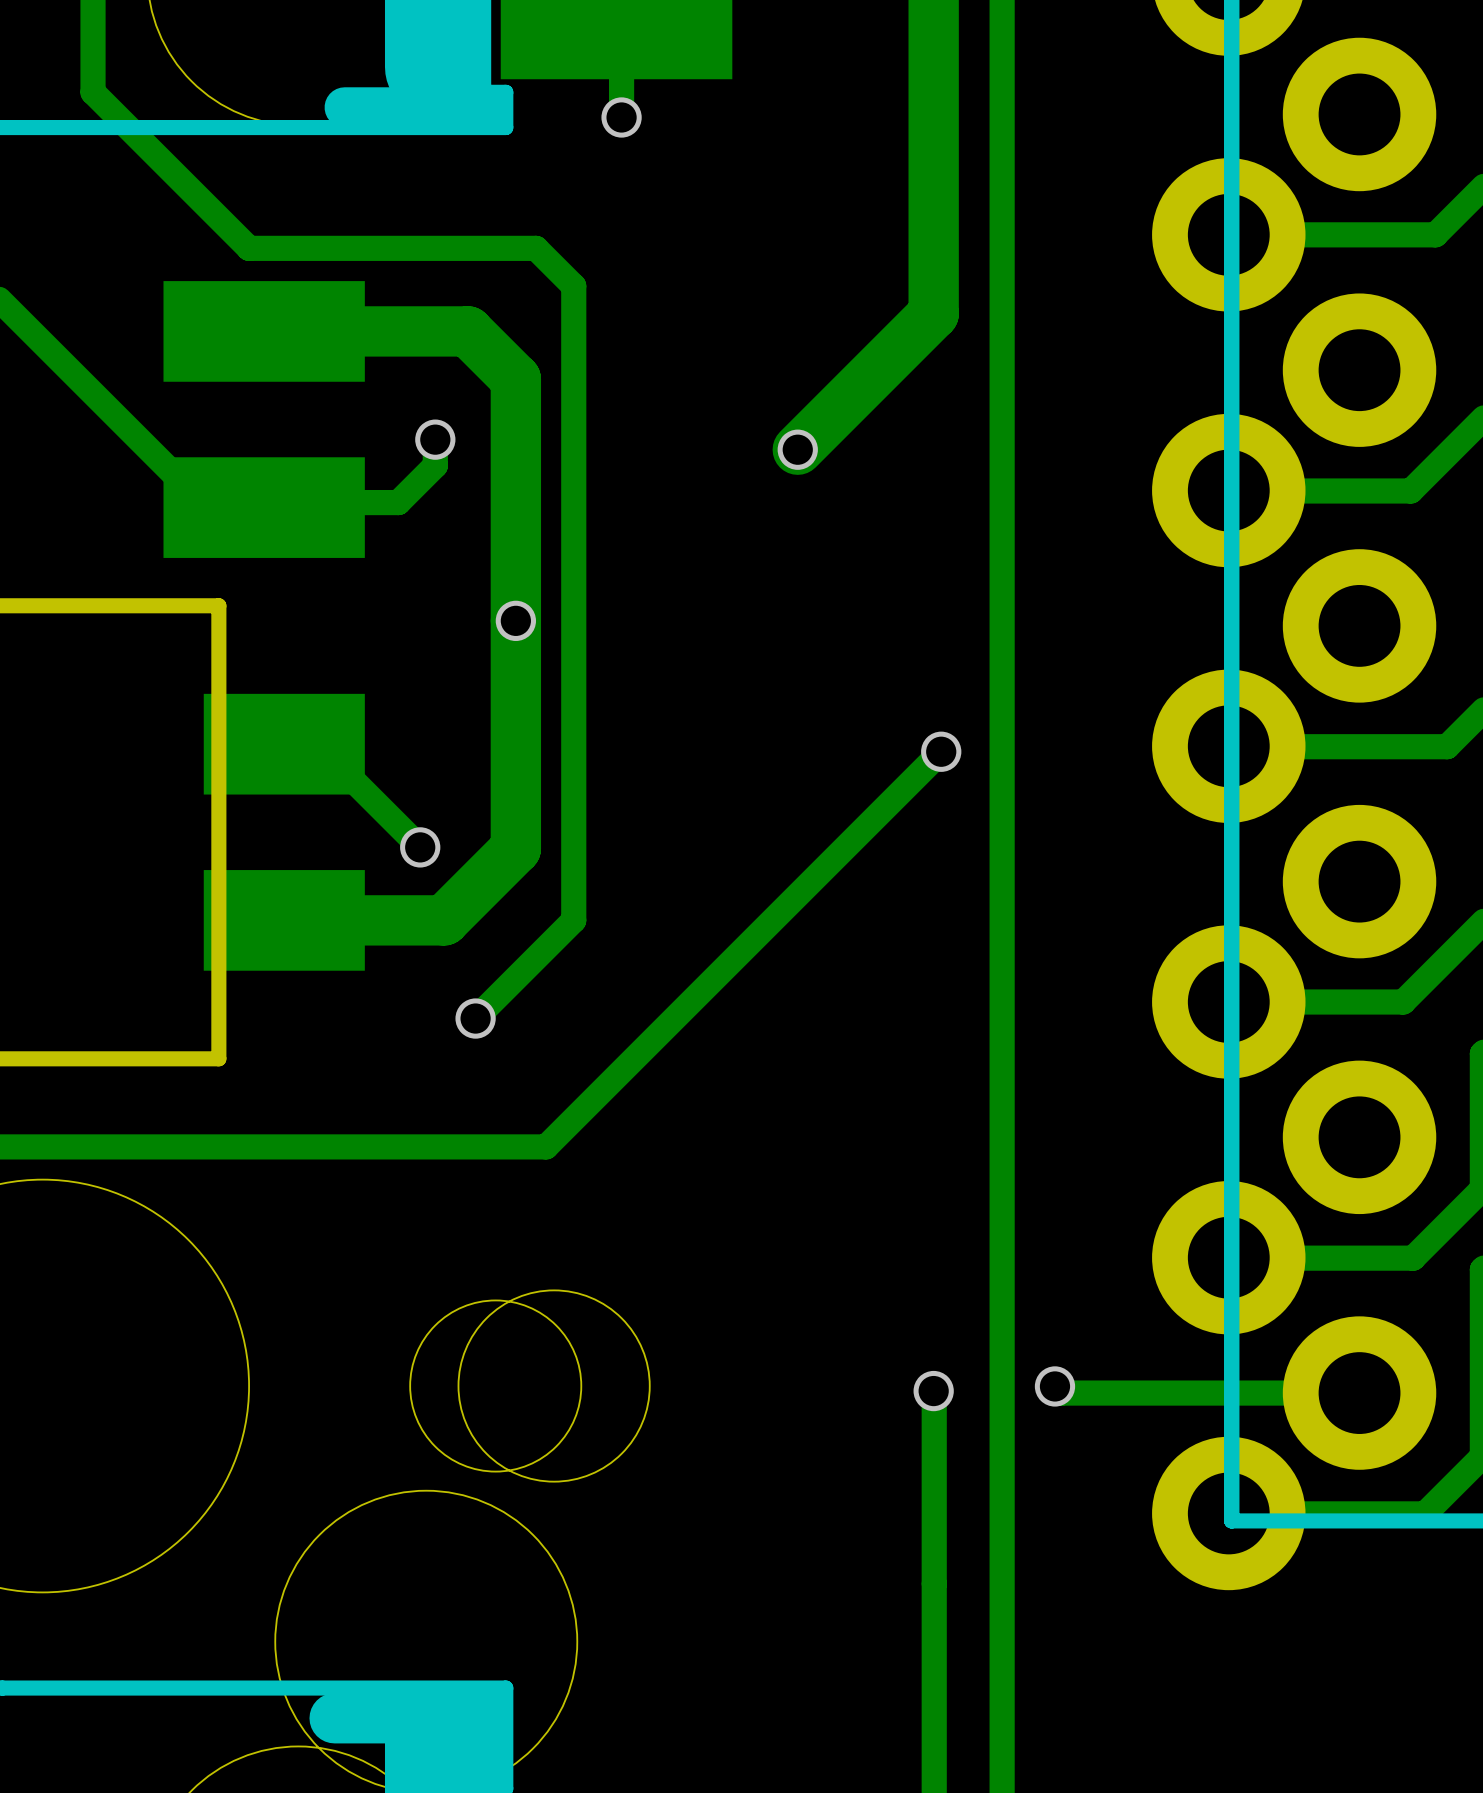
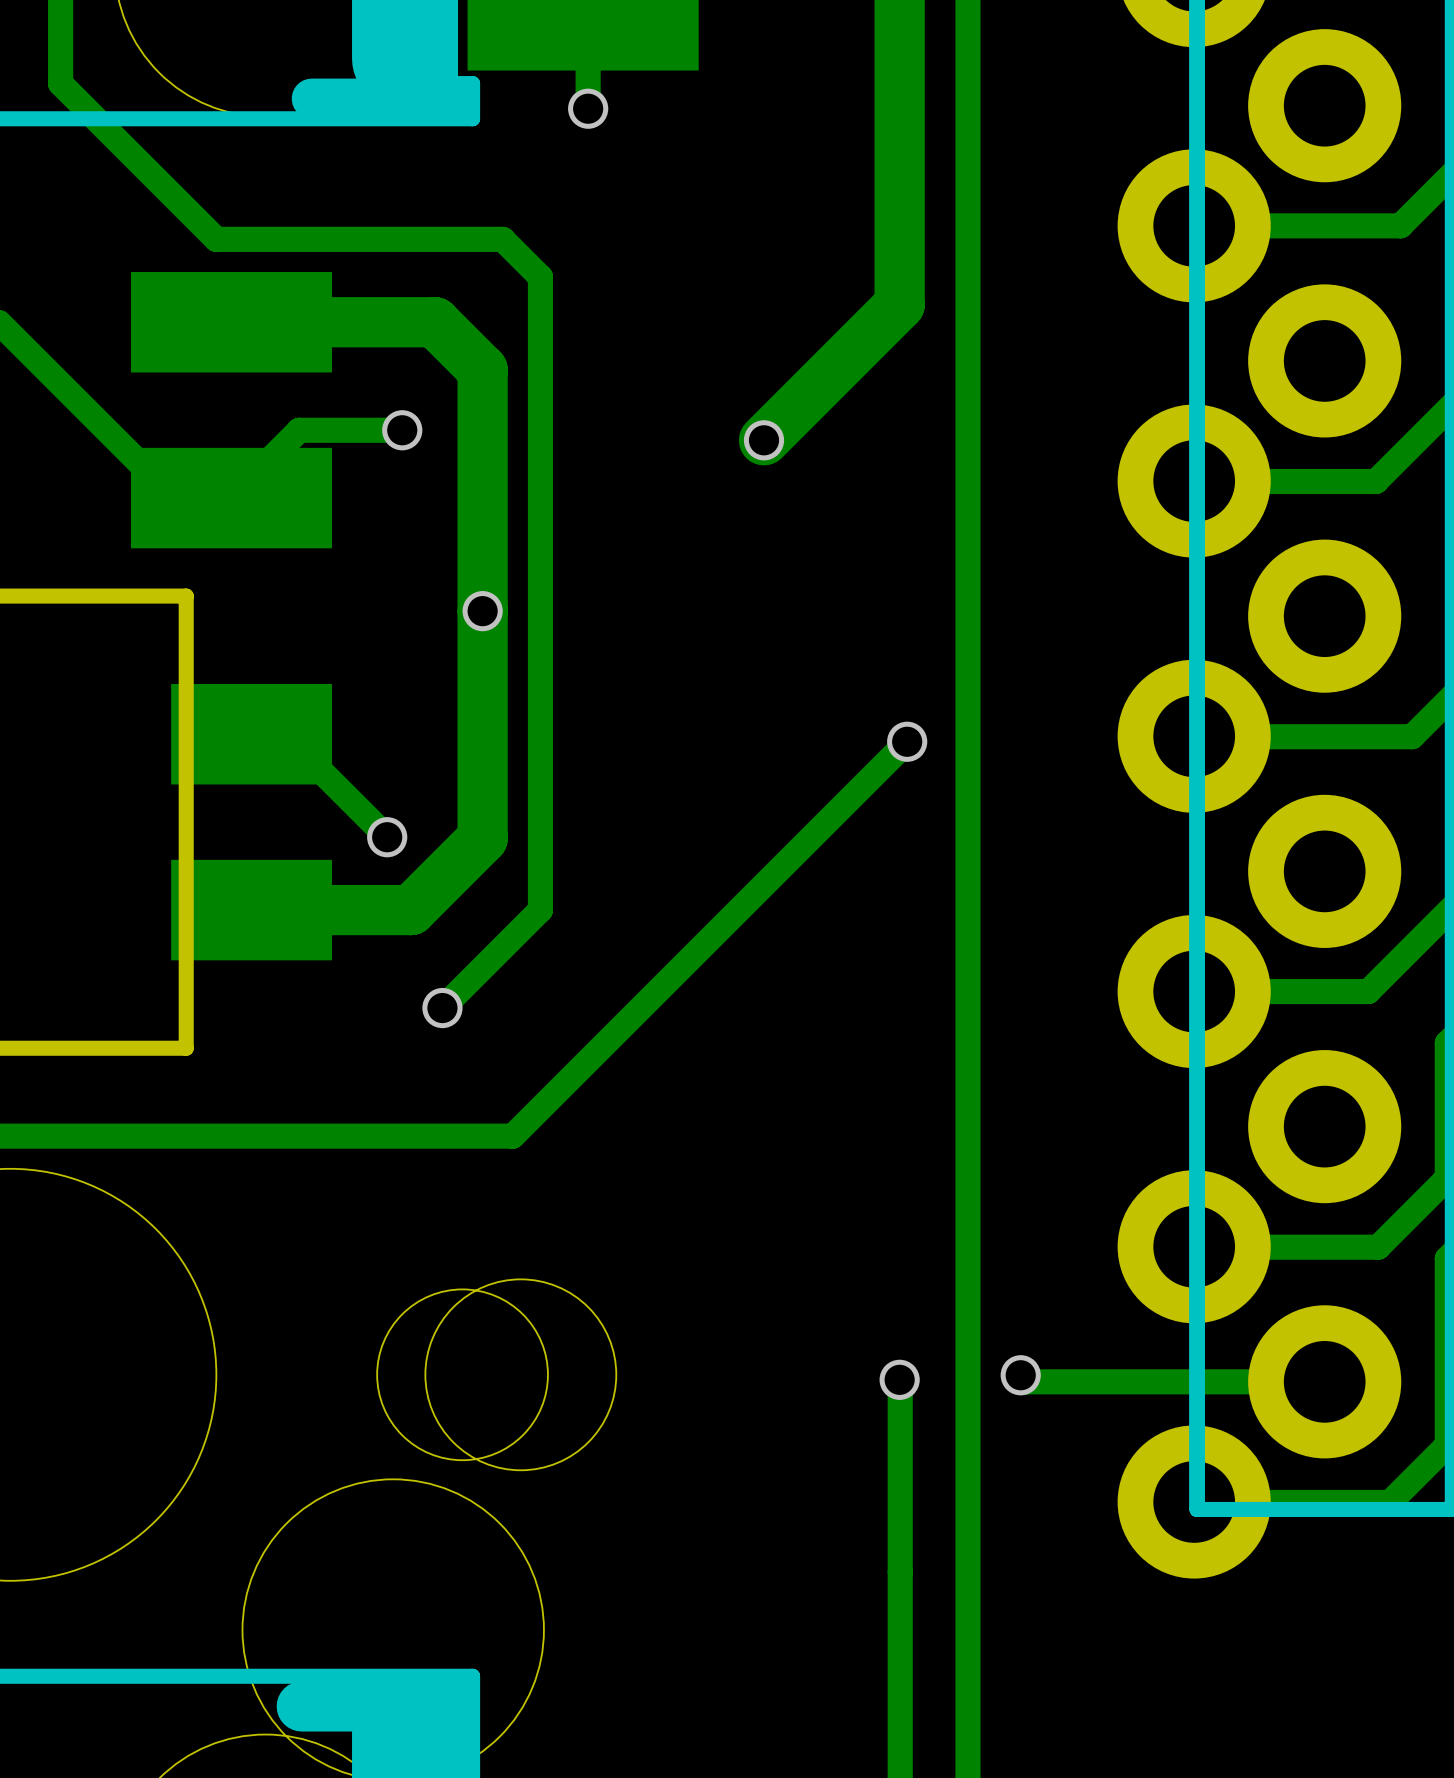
track: (435, 439) (435, 465) (398, 502) (269, 502) -> (402, 430) (299, 430) (236, 493)

